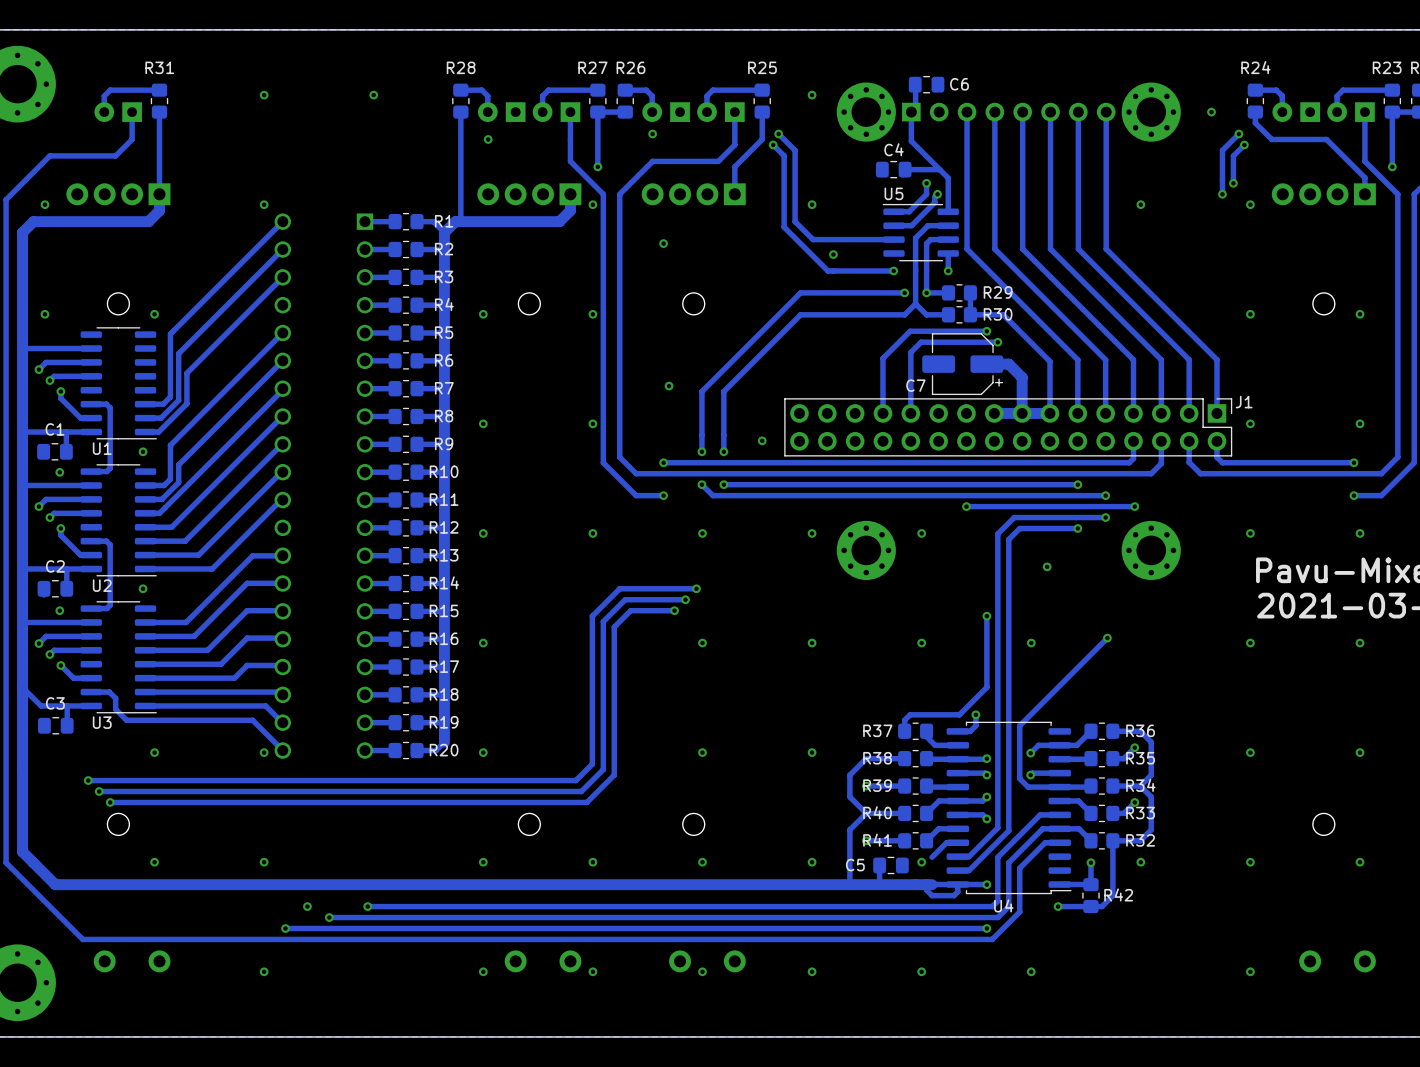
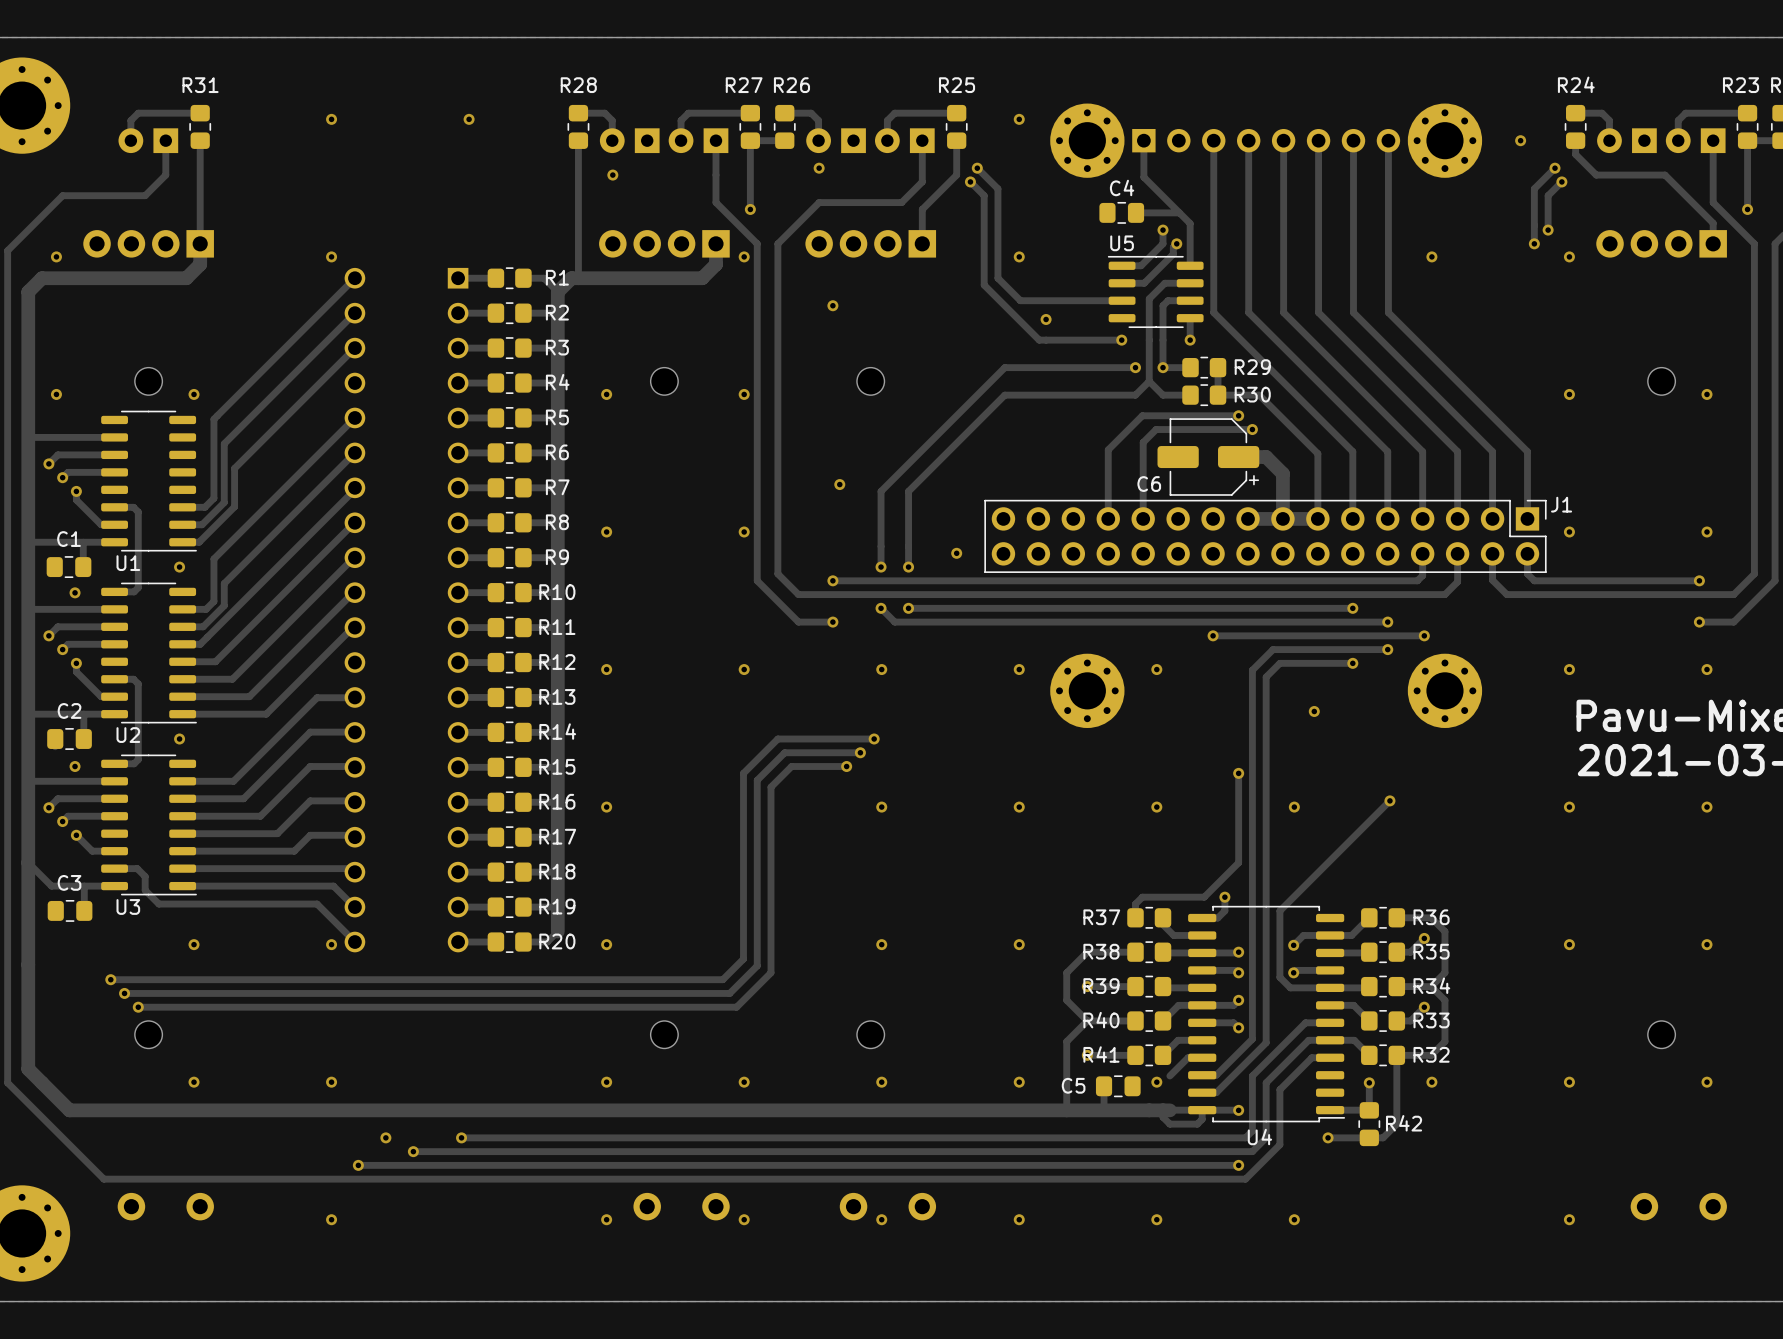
track: (915, 84) (915, 106) -> none
C6: (926, 84) -> none
C7 name: C7 (915, 385) -> C6 (1149, 484)

